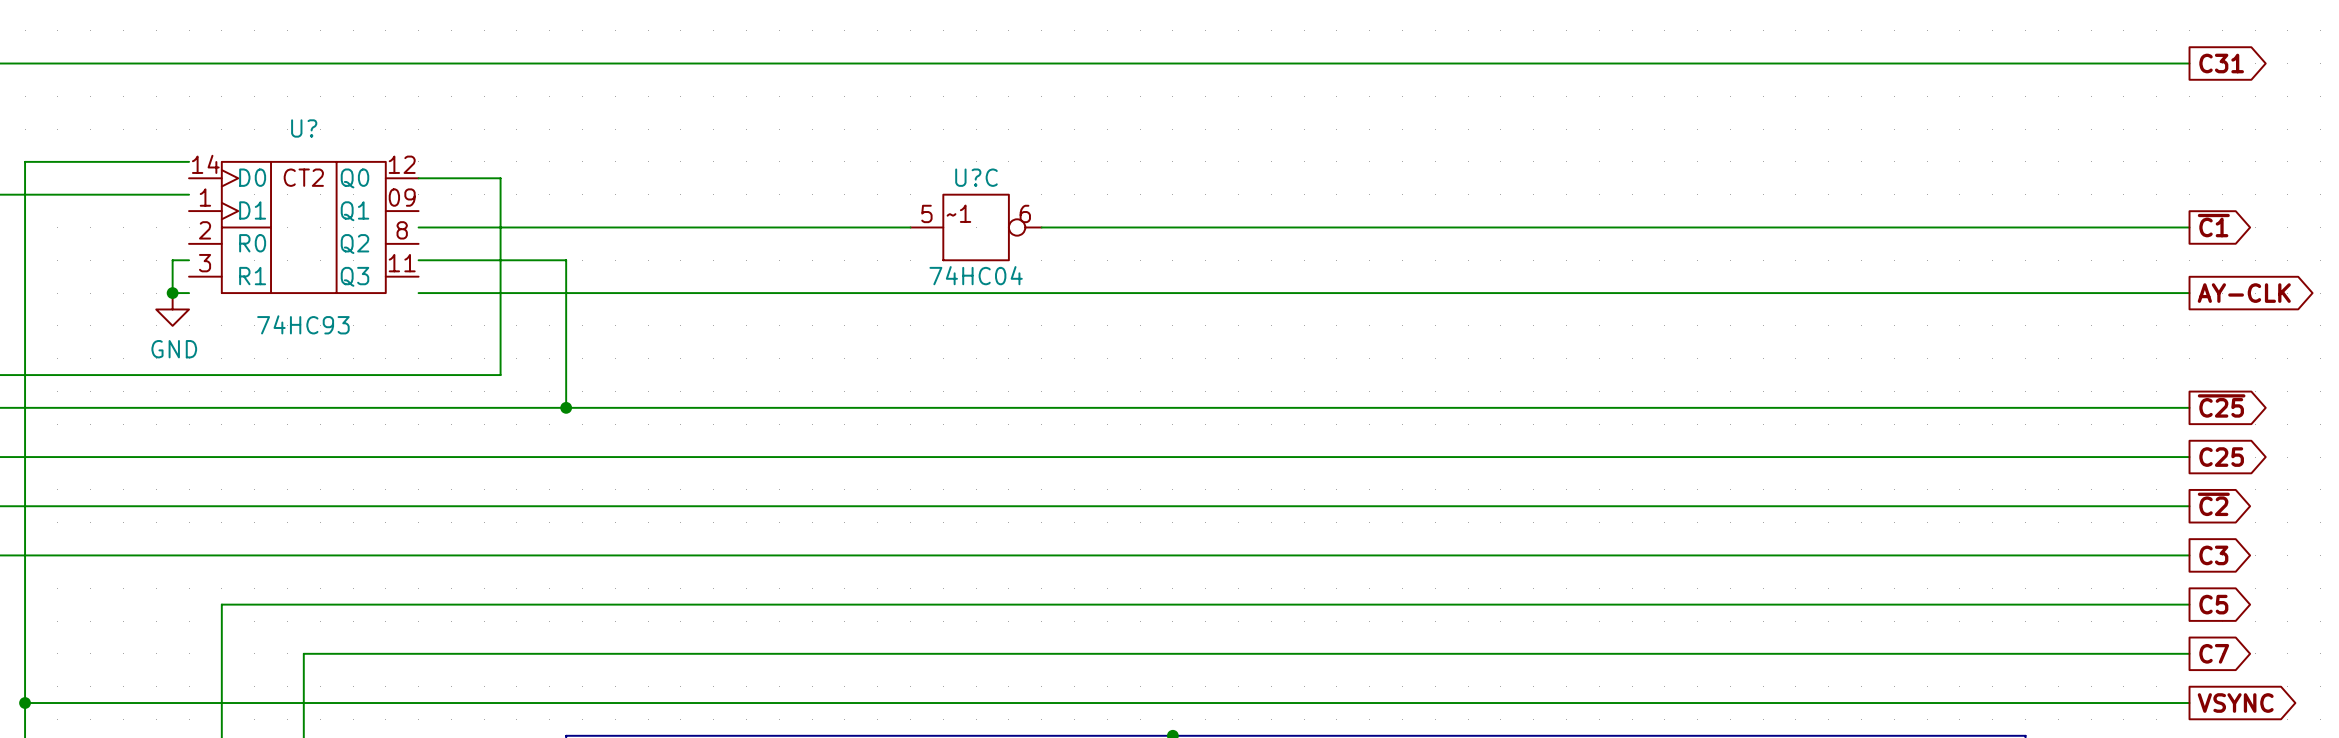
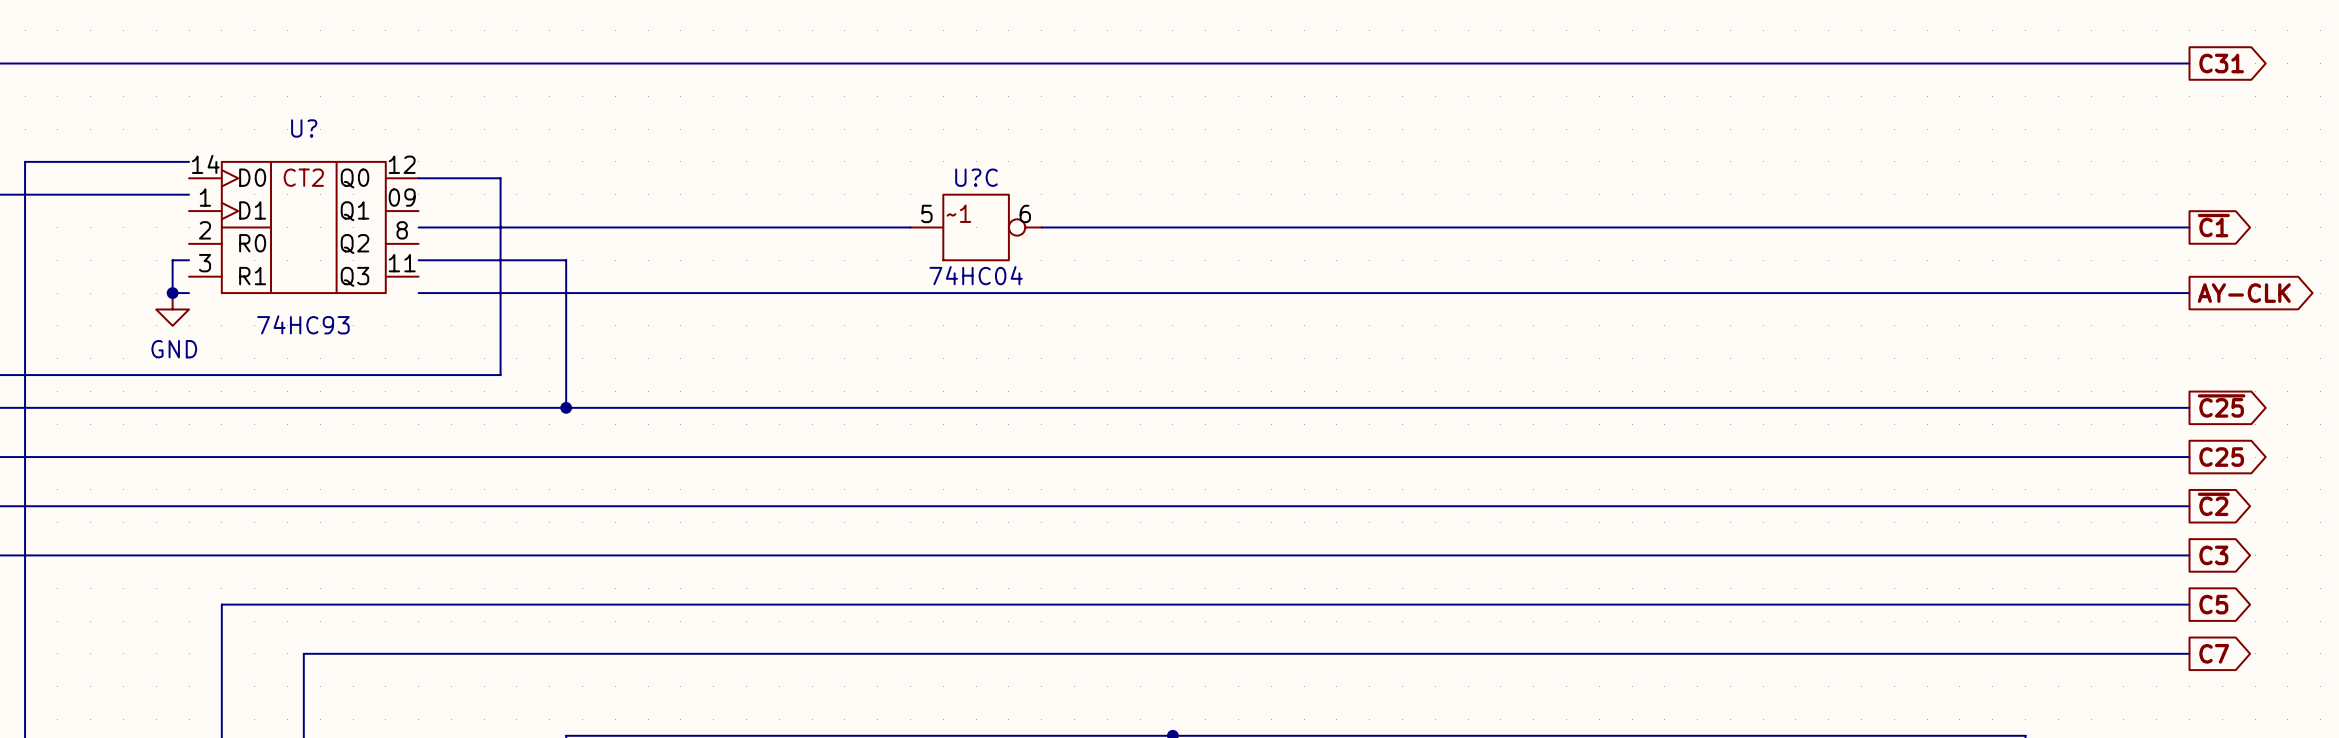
wire: (25, 703) (2189, 703) -> none
junction: (25, 703) -> none
global label: VSYNC (2235, 703) -> none

